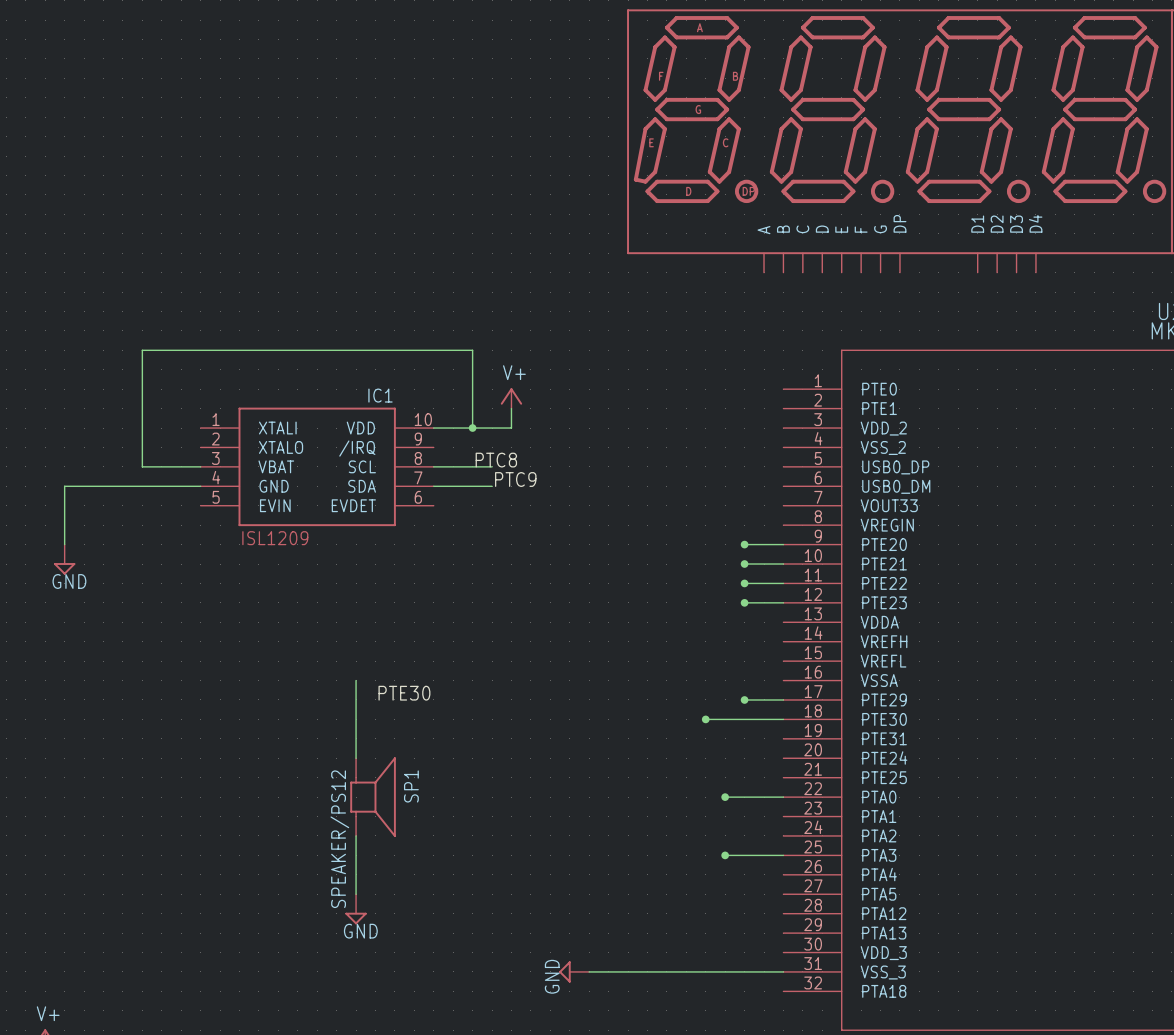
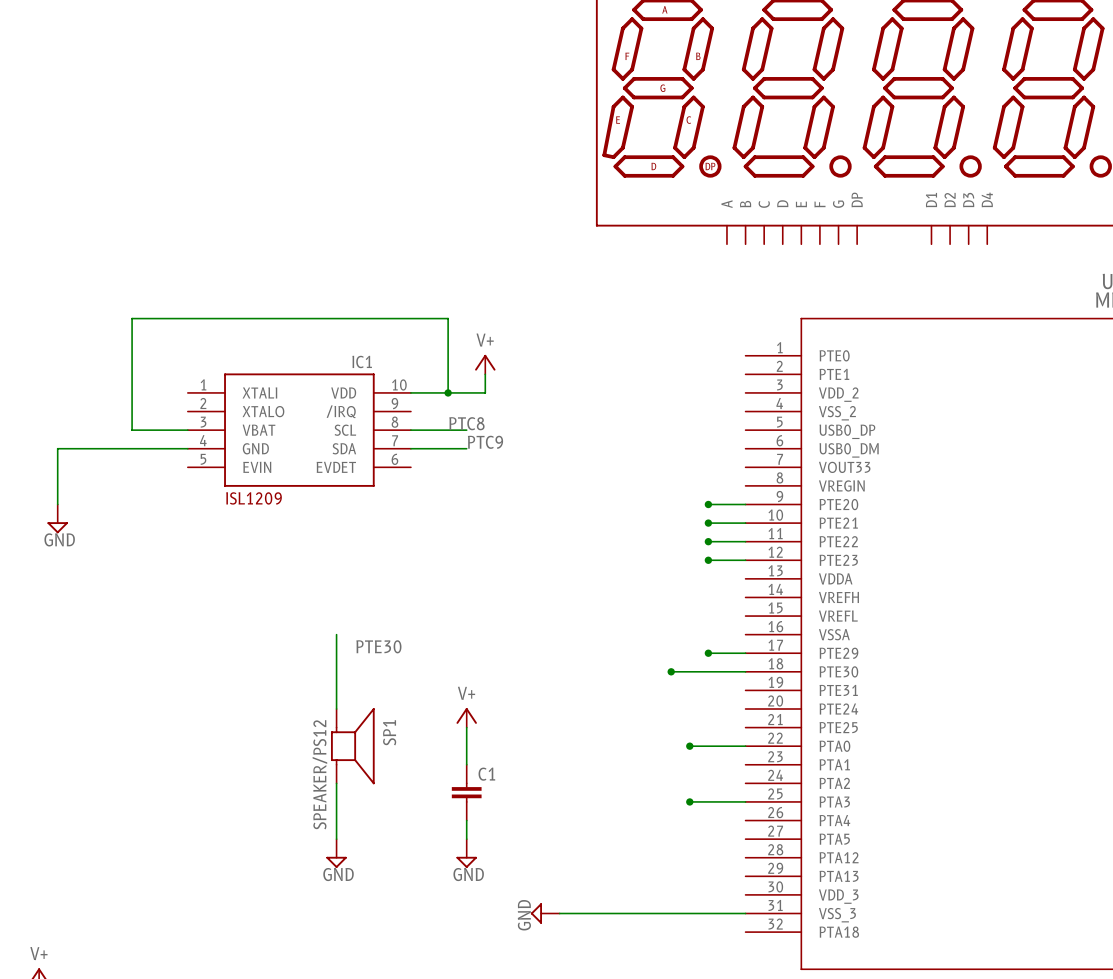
power symbol: none -> V+ (466, 717)
wire: none -> (466, 727) (466, 764)
C1: none -> (466, 792)
wire: none -> (466, 820) (466, 839)
power symbol: none -> GND (466, 853)

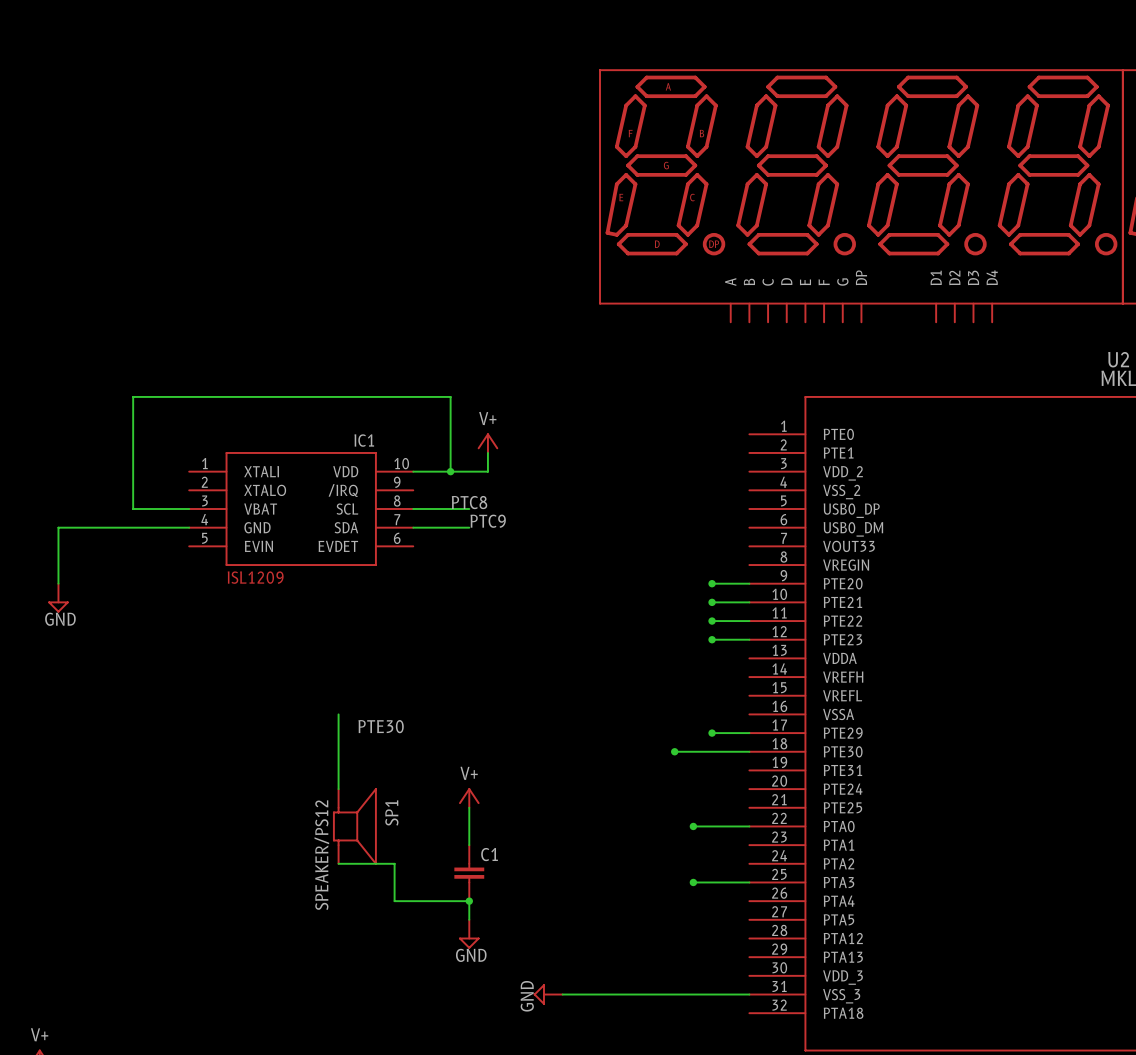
wire: (336, 783) (336, 839) -> (338, 863) (394, 863) (394, 901) (469, 901)
junction: none -> (469, 901)
power symbol: GND (336, 853) -> none

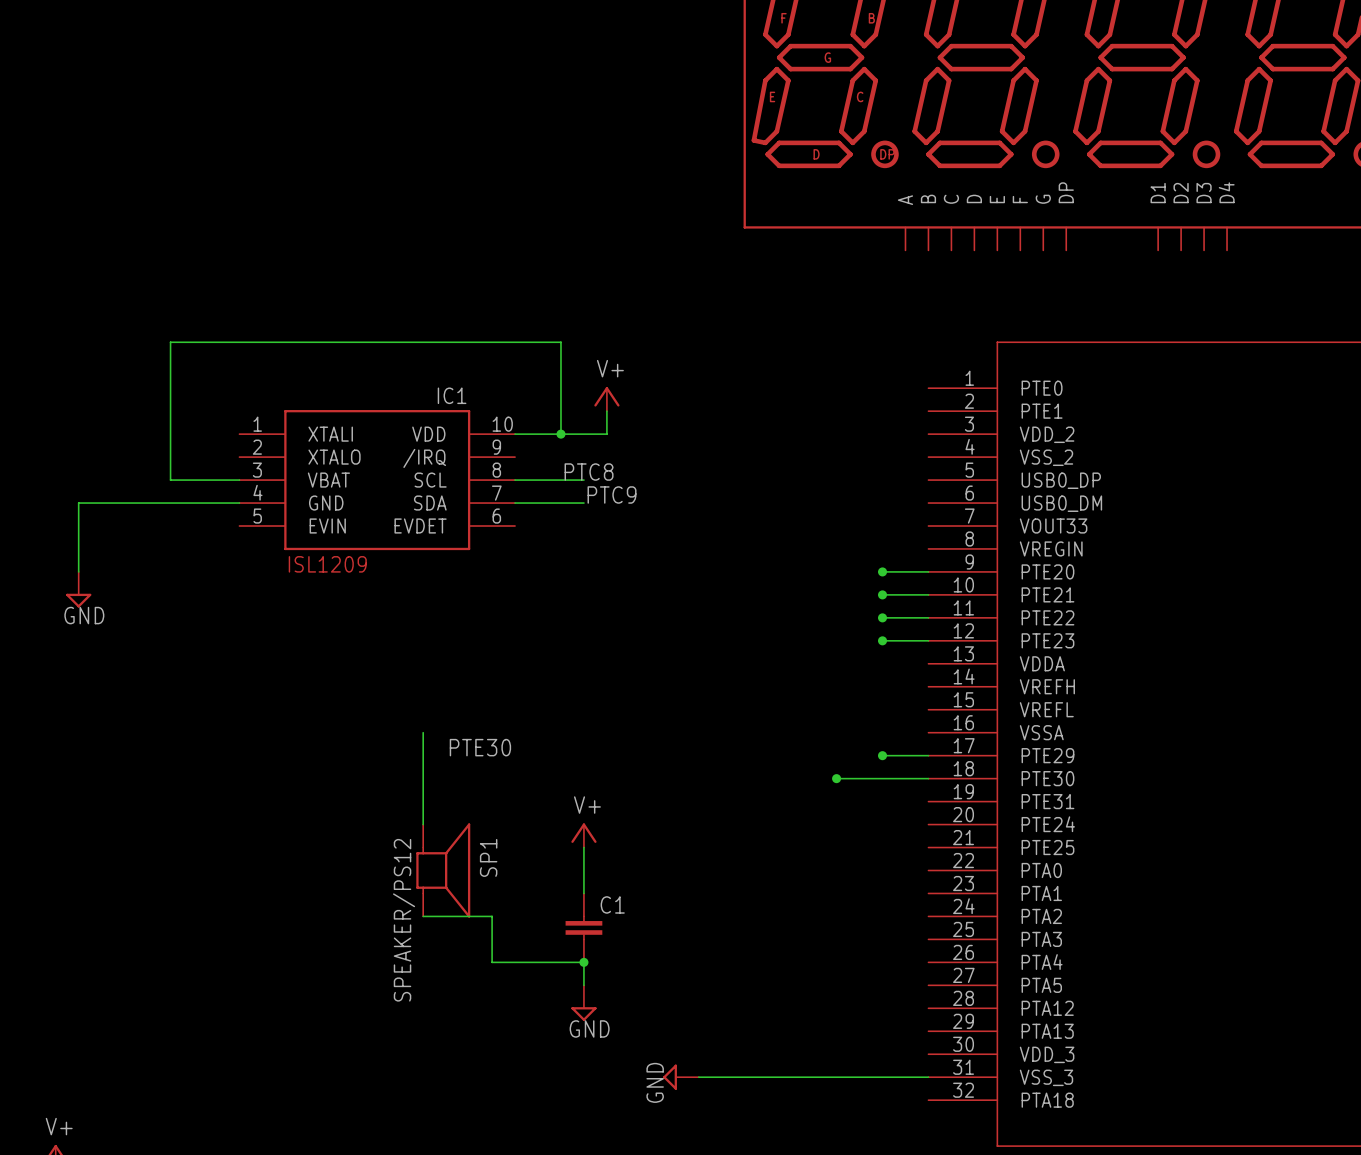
wire: (693, 826) (749, 826) -> none
junction: (693, 826) -> none
wire: (693, 882) (749, 882) -> none
junction: (693, 882) -> none

